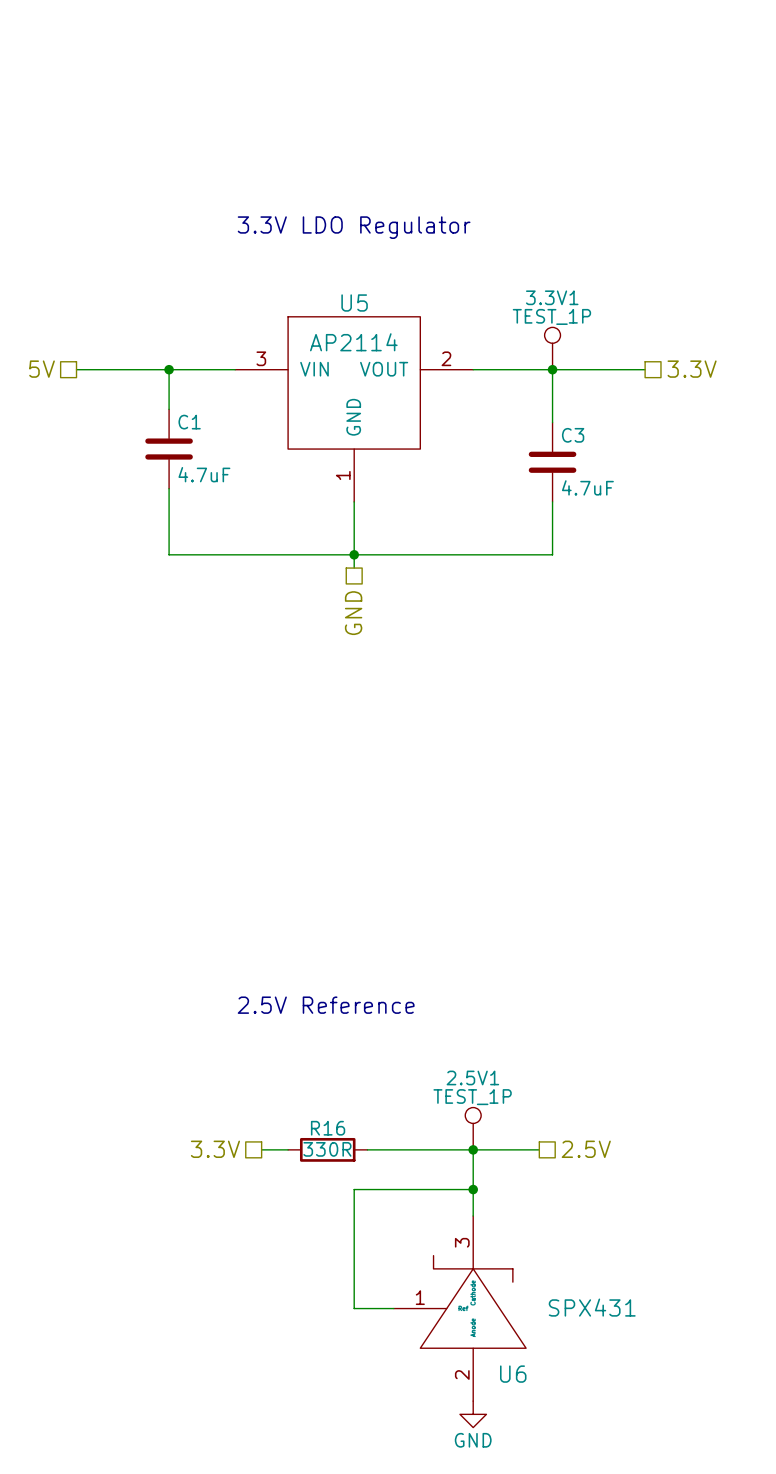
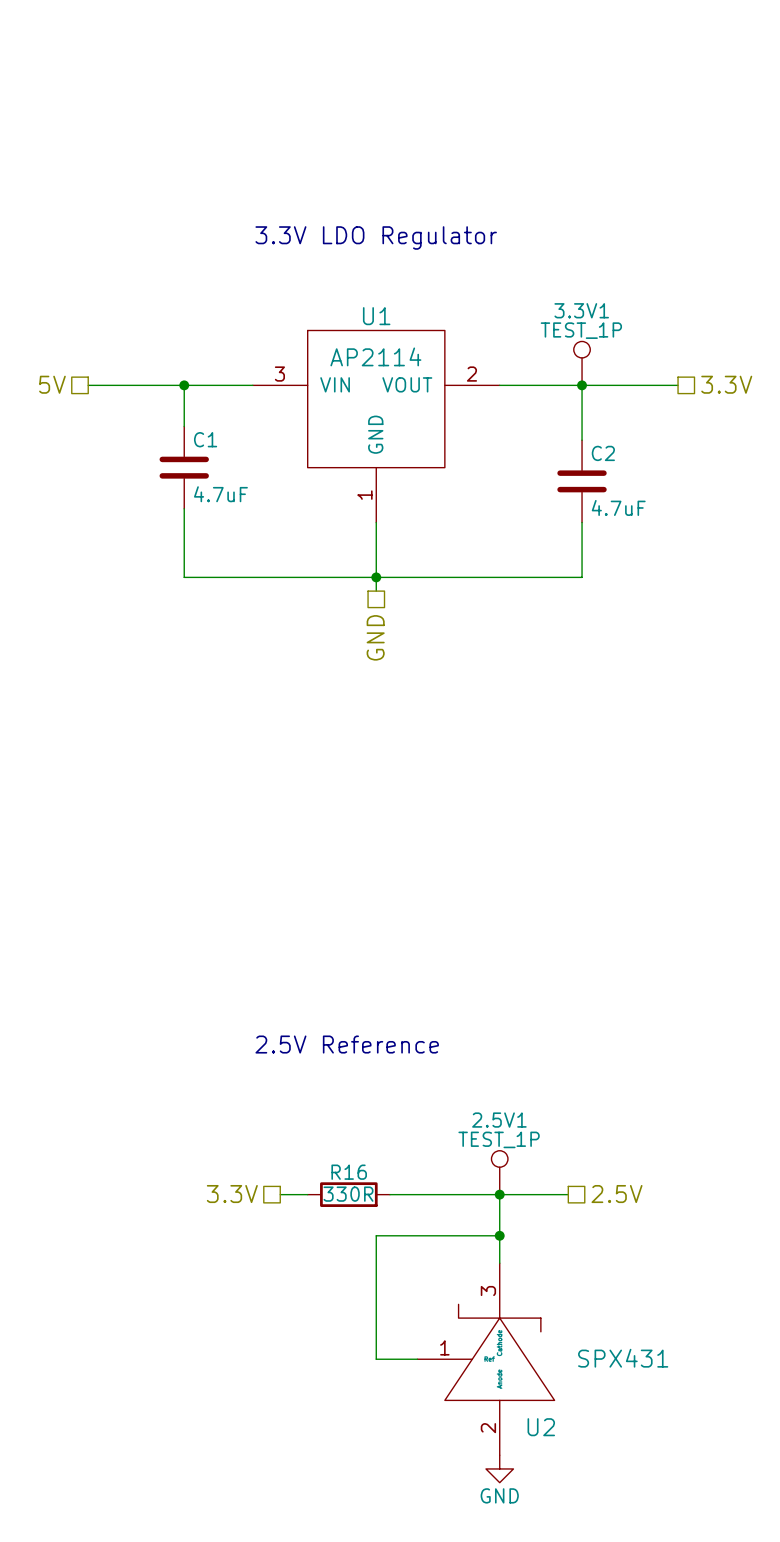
U5 name: U5 (354, 302) -> U1 (376, 316)
C3 name: C3 (573, 435) -> C2 (603, 453)
U6 name: U6 (513, 1374) -> U2 (541, 1427)

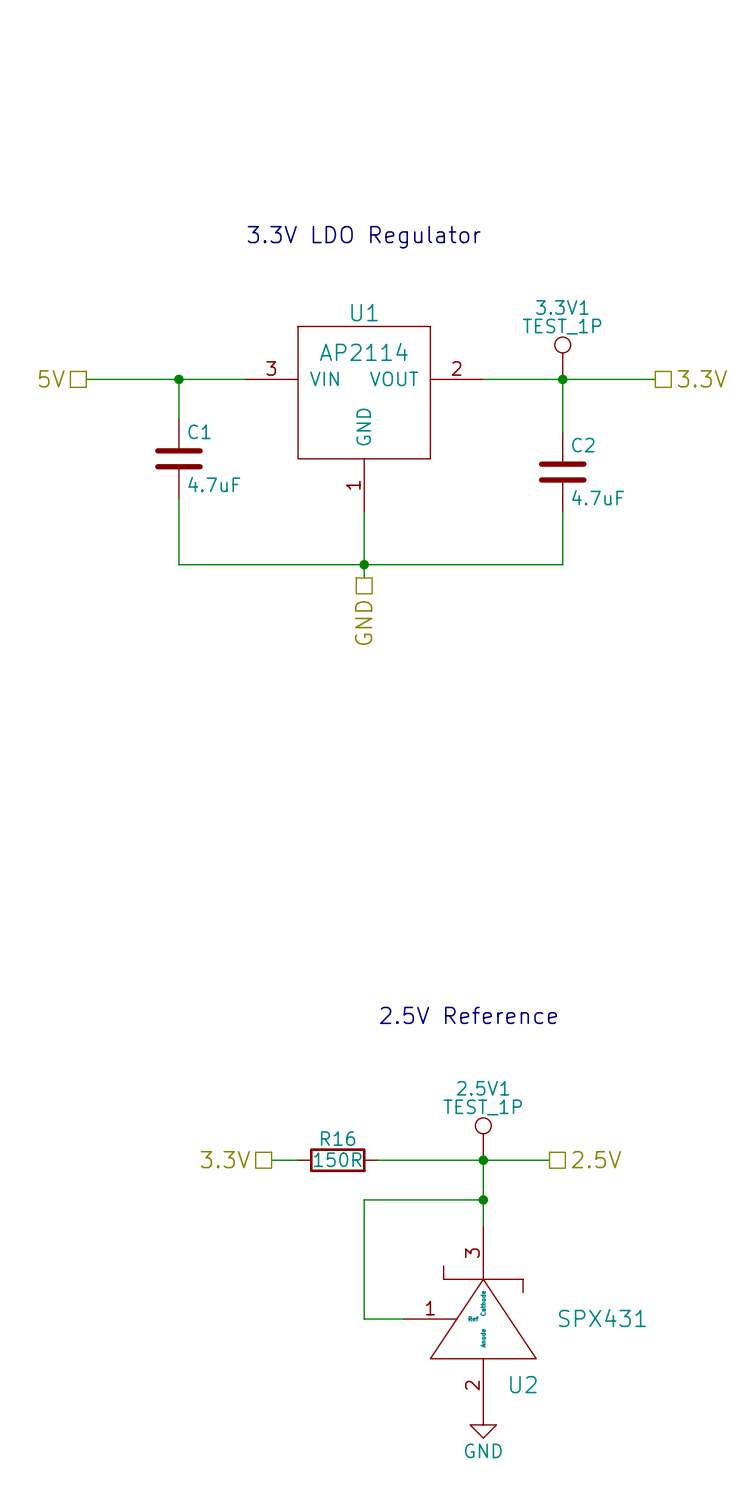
text position: 2.5V Reference (347, 1044) -> 2.5V Reference (468, 1015)
R16 value: 330R (348, 1194) -> 150R (337, 1159)

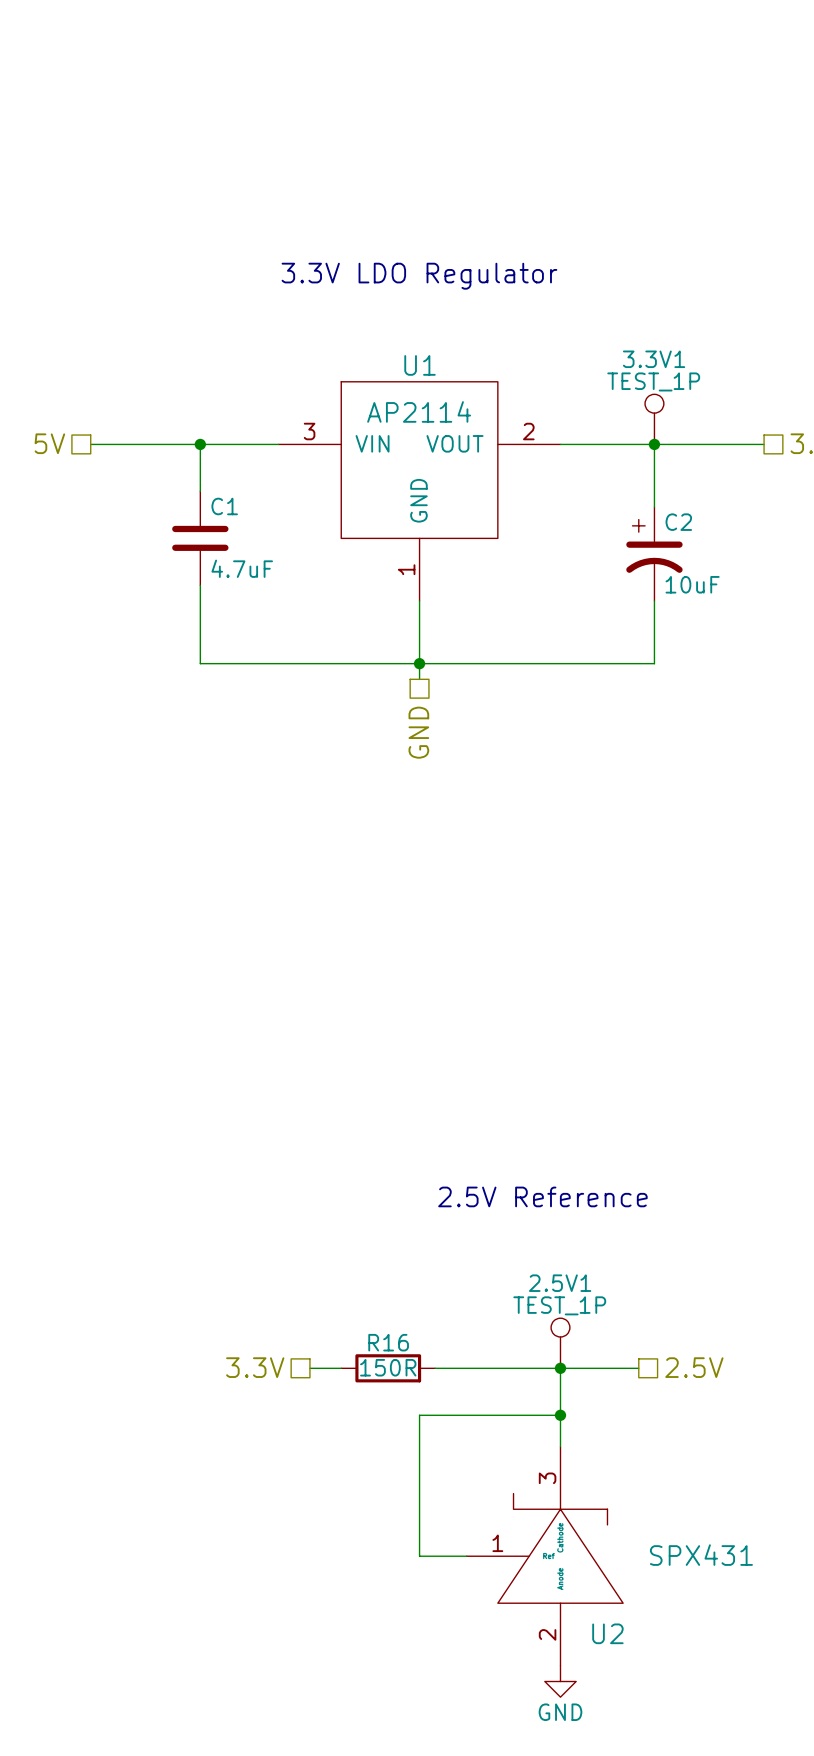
C2 symbol: [538, 432, 587, 512] -> [626, 507, 683, 602]
C2 value: 4.7uF (598, 497) -> 10uF (692, 584)

